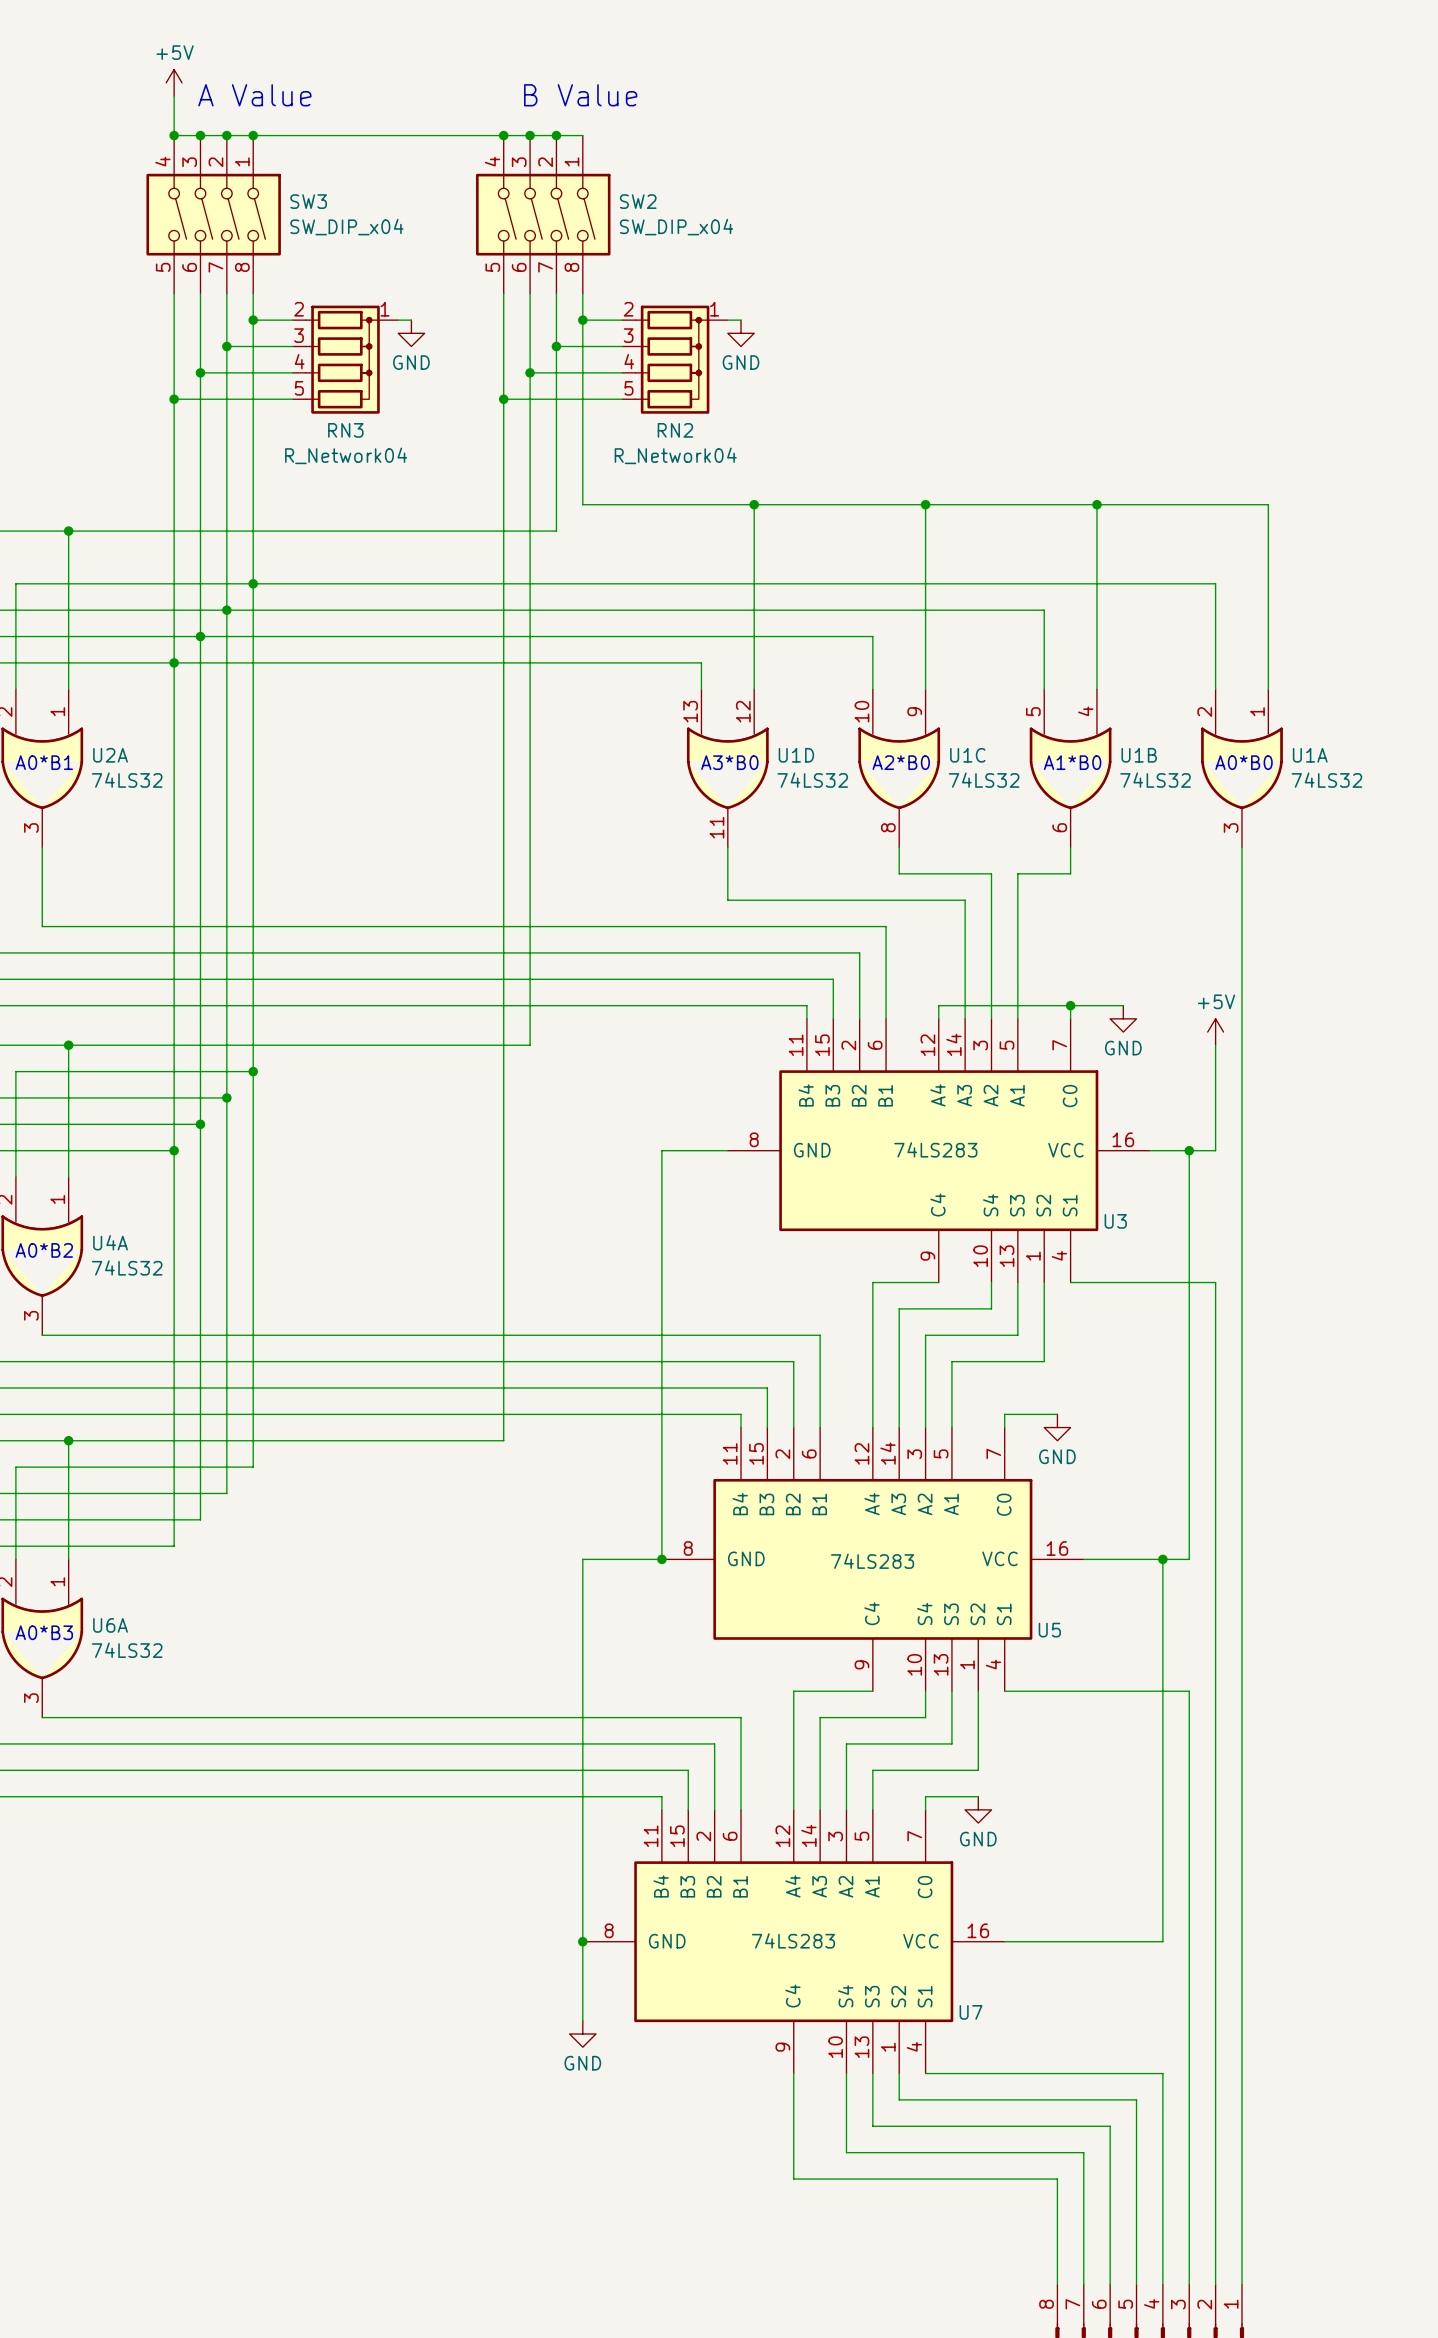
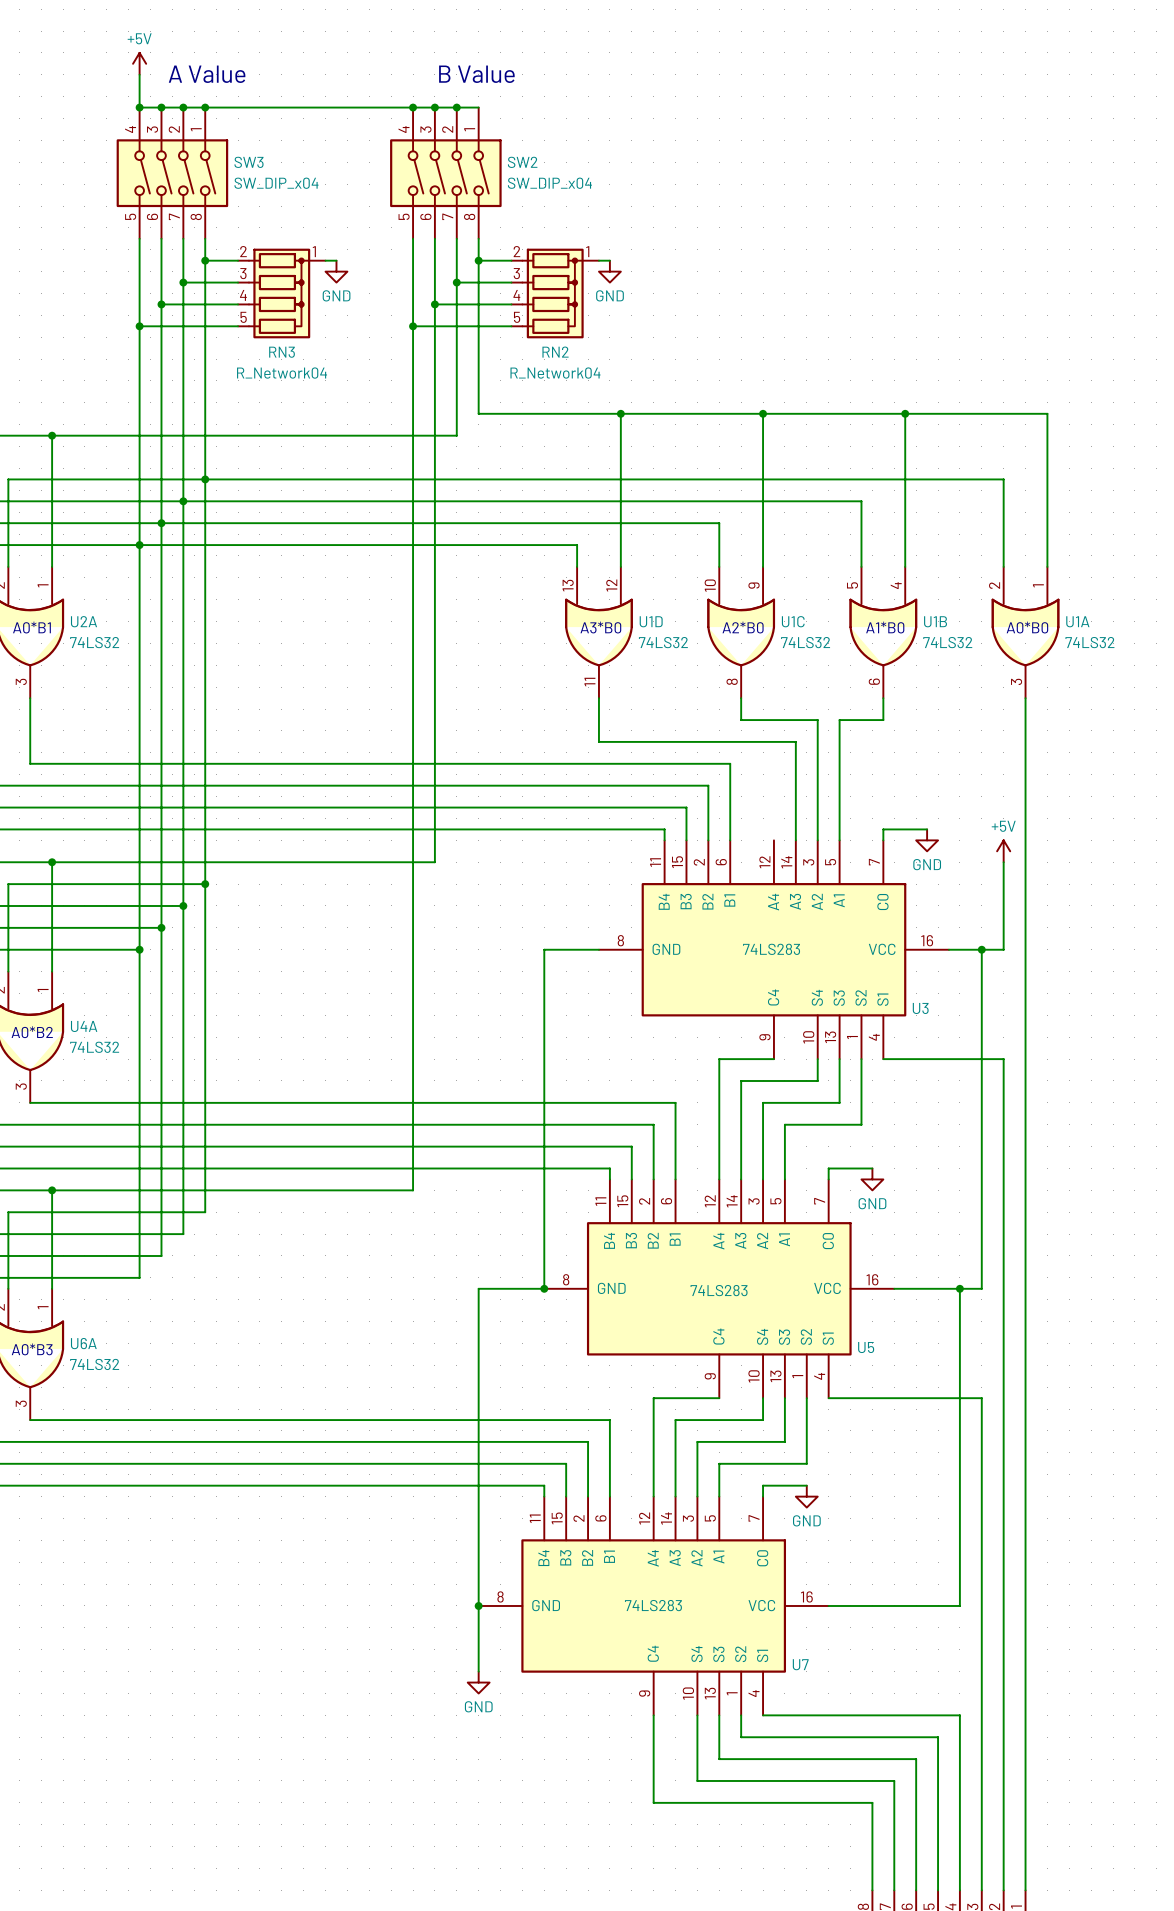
wire: (1070, 1005) (938, 1005) (938, 1018) -> none
junction: (1070, 1005) -> none

